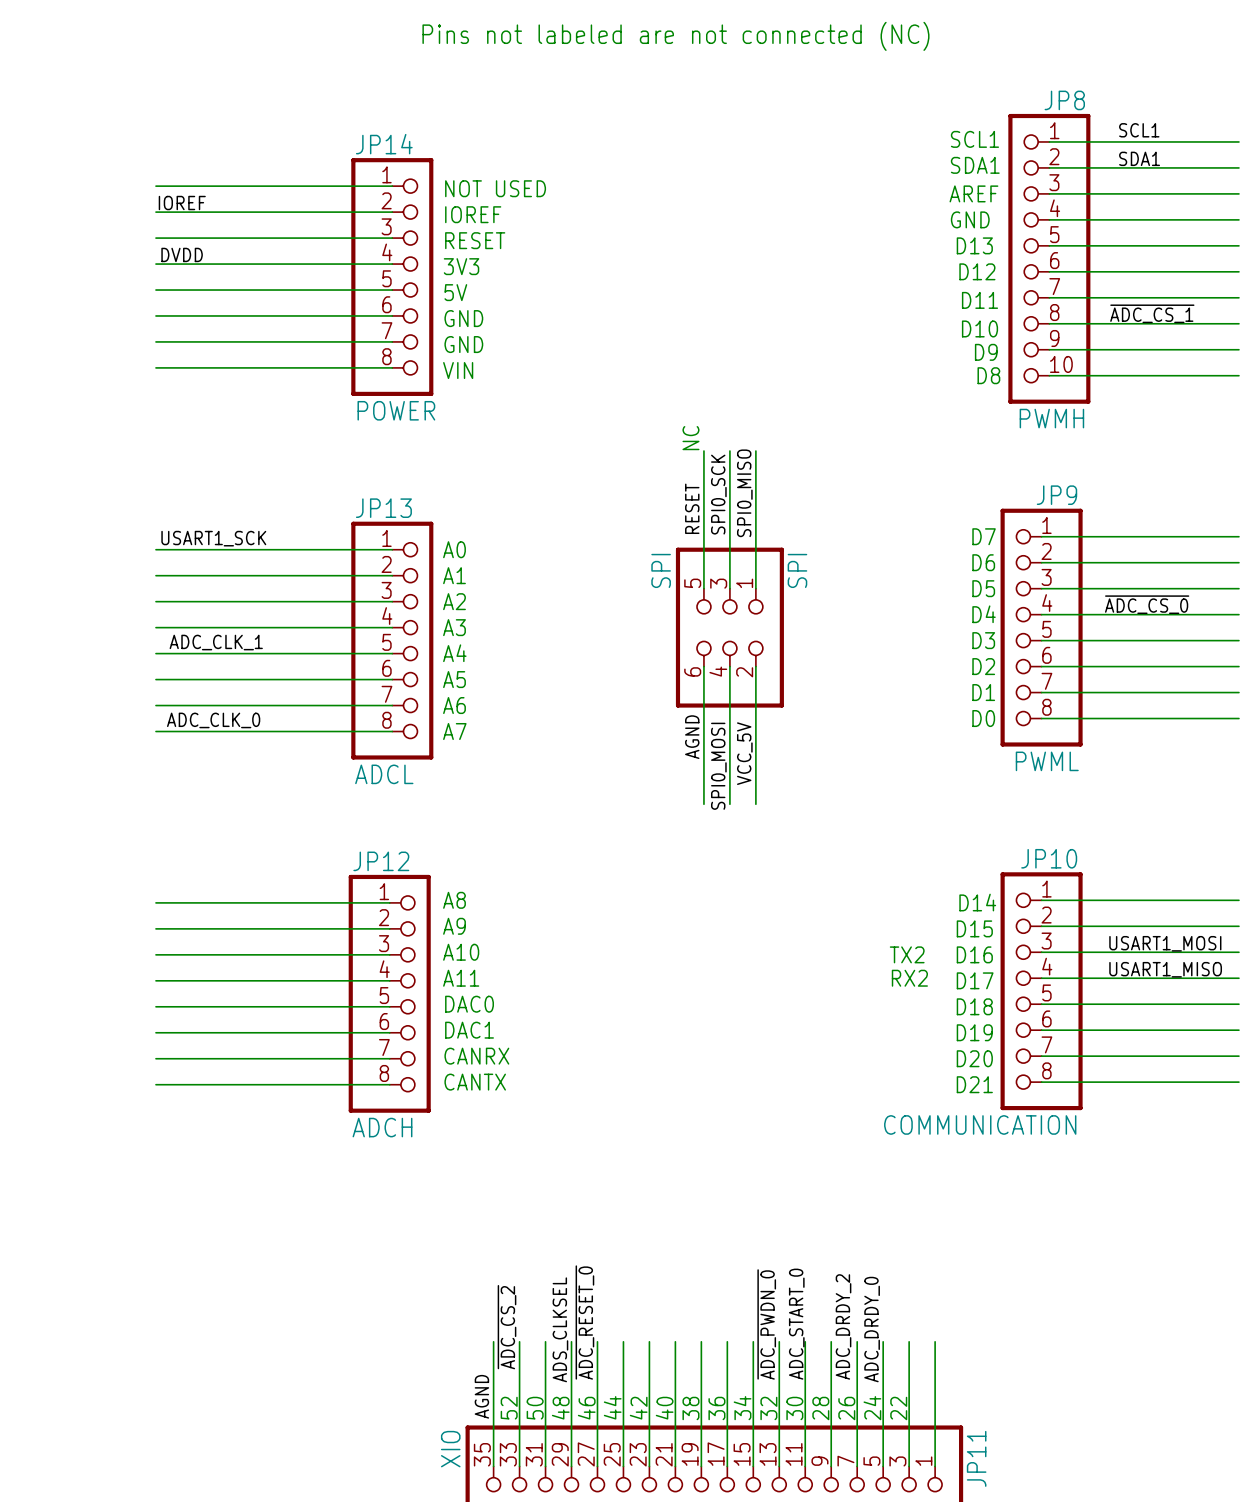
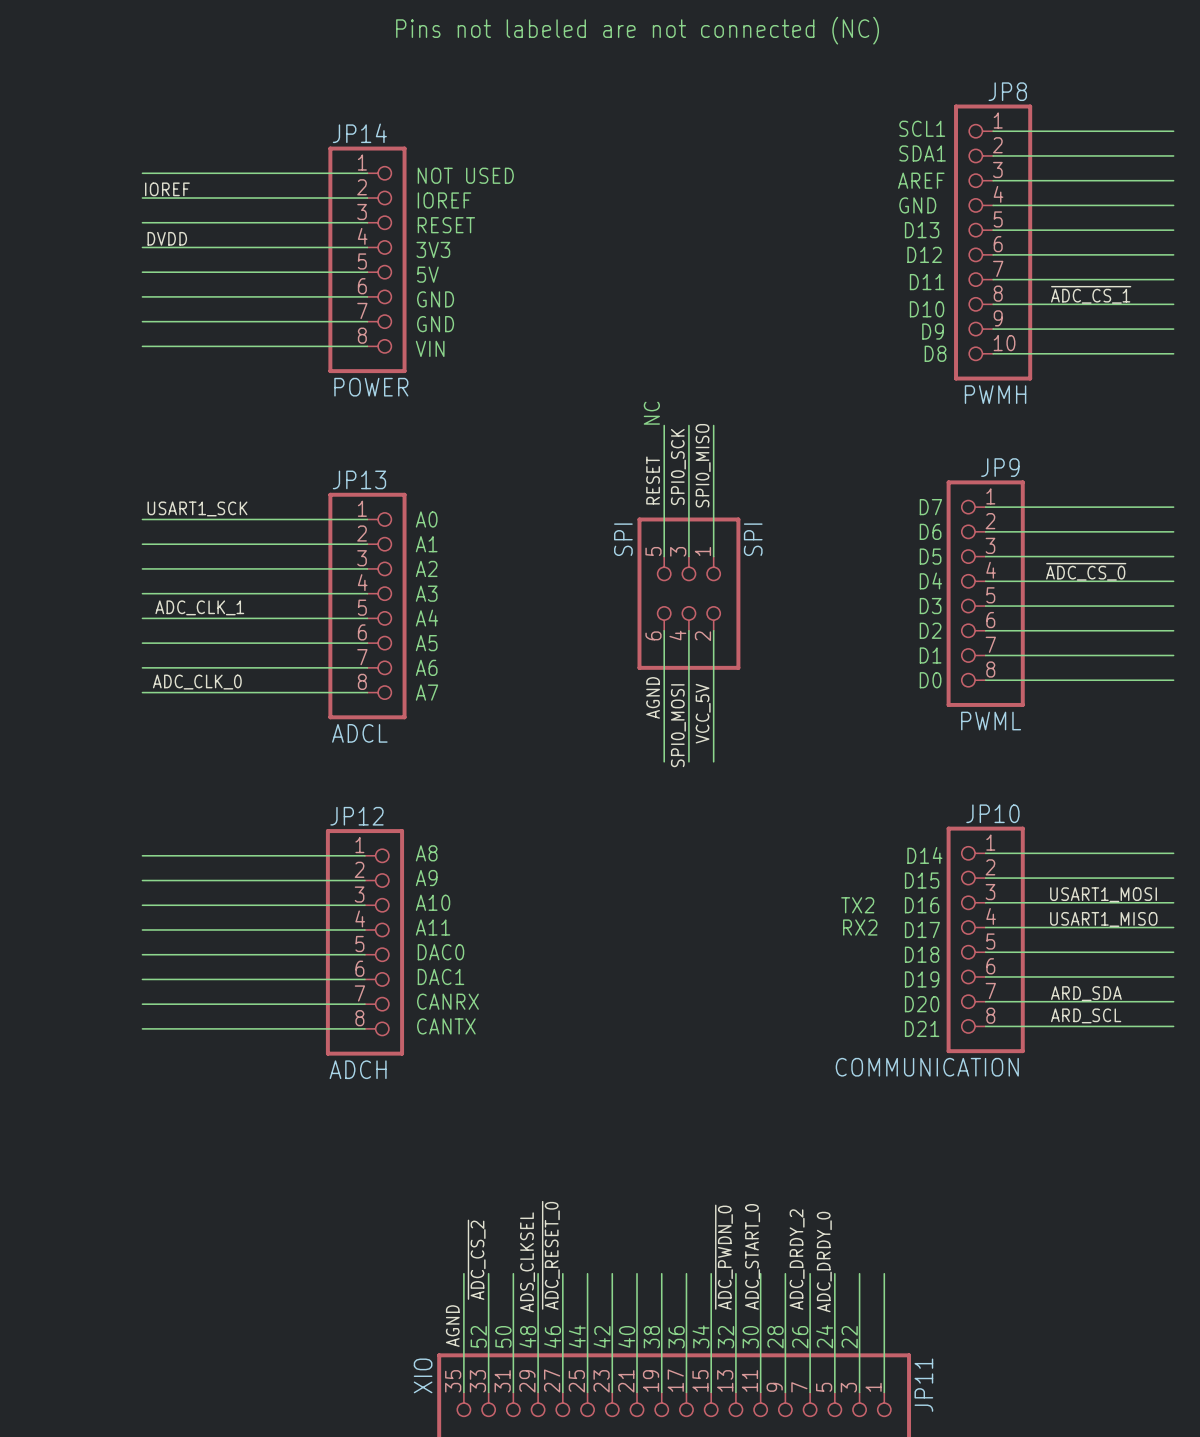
label: SCL1 (1139, 130) -> none
label: SDA1 (1139, 158) -> none
label: none -> ARD_SDA (1086, 993)
label: none -> ARD_SCL (1086, 1015)

